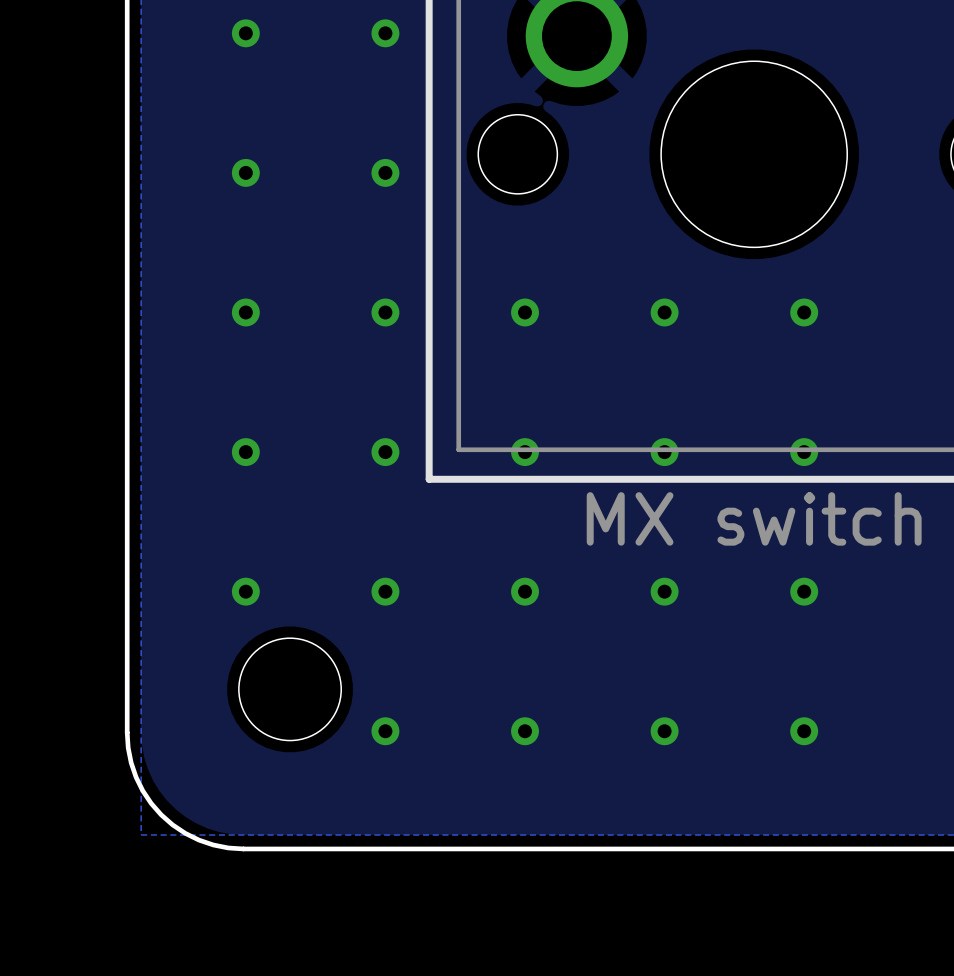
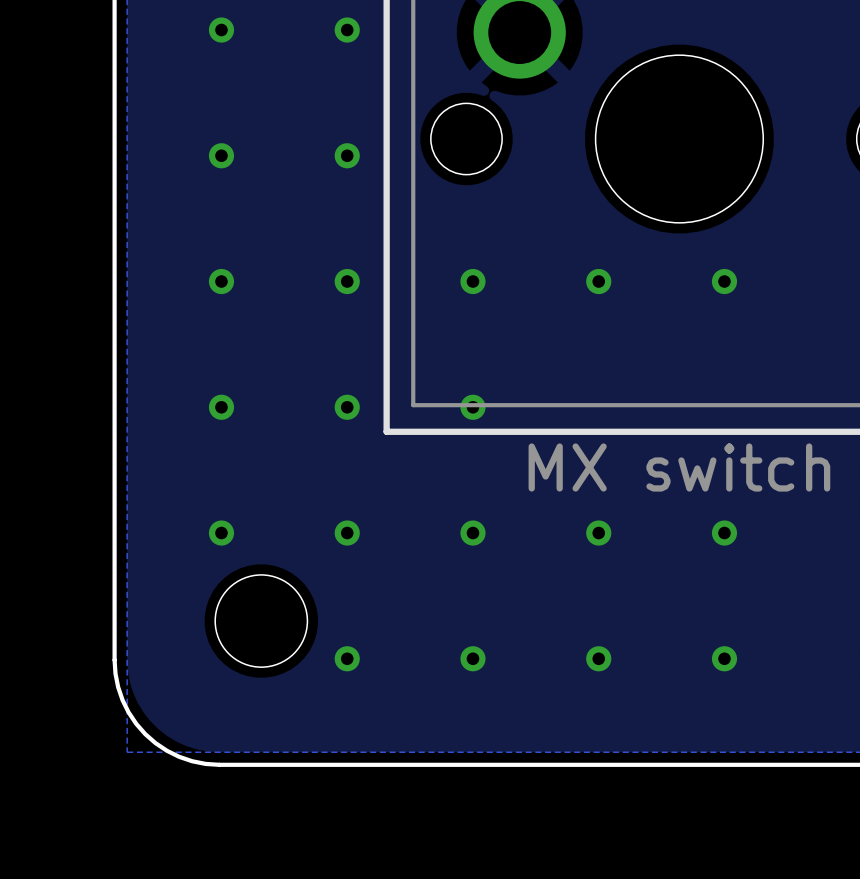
via: (664, 452) -> none
via: (804, 452) -> none

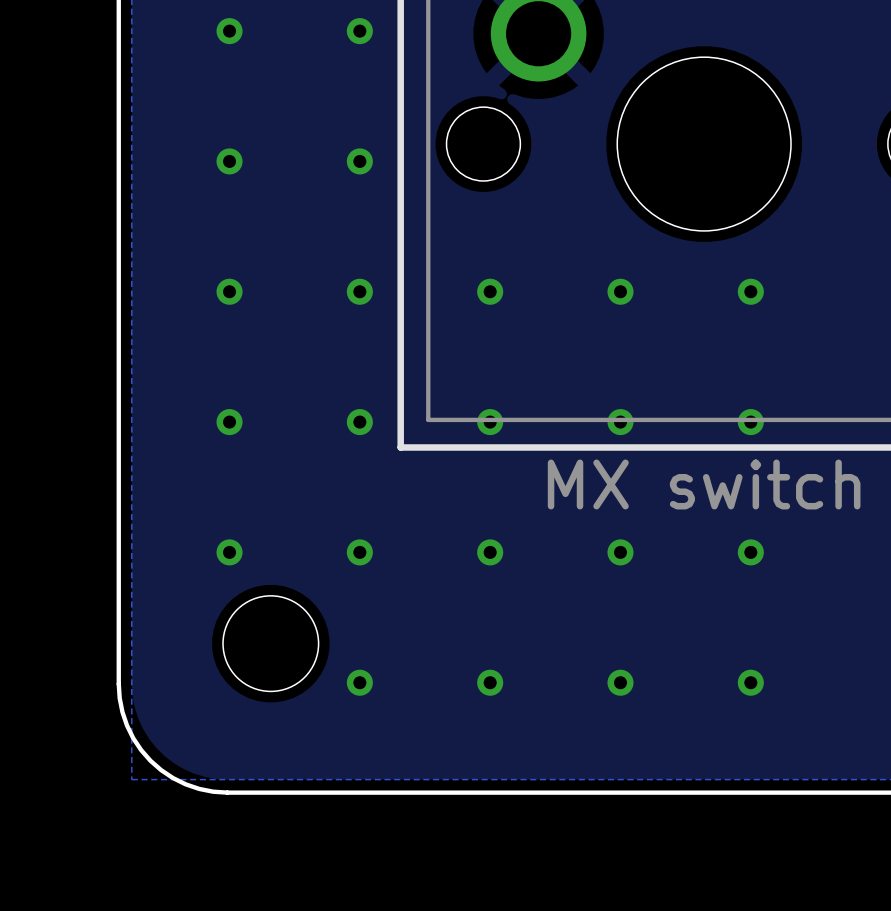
via: none -> (620, 422)
via: none -> (750, 422)

